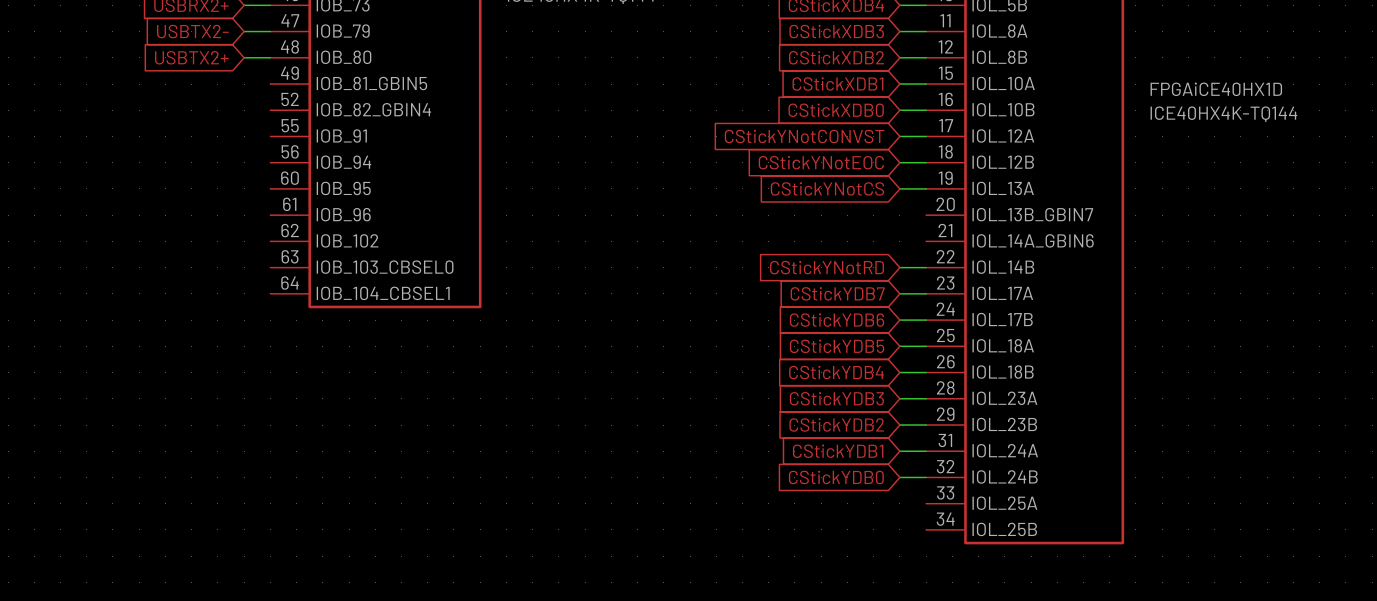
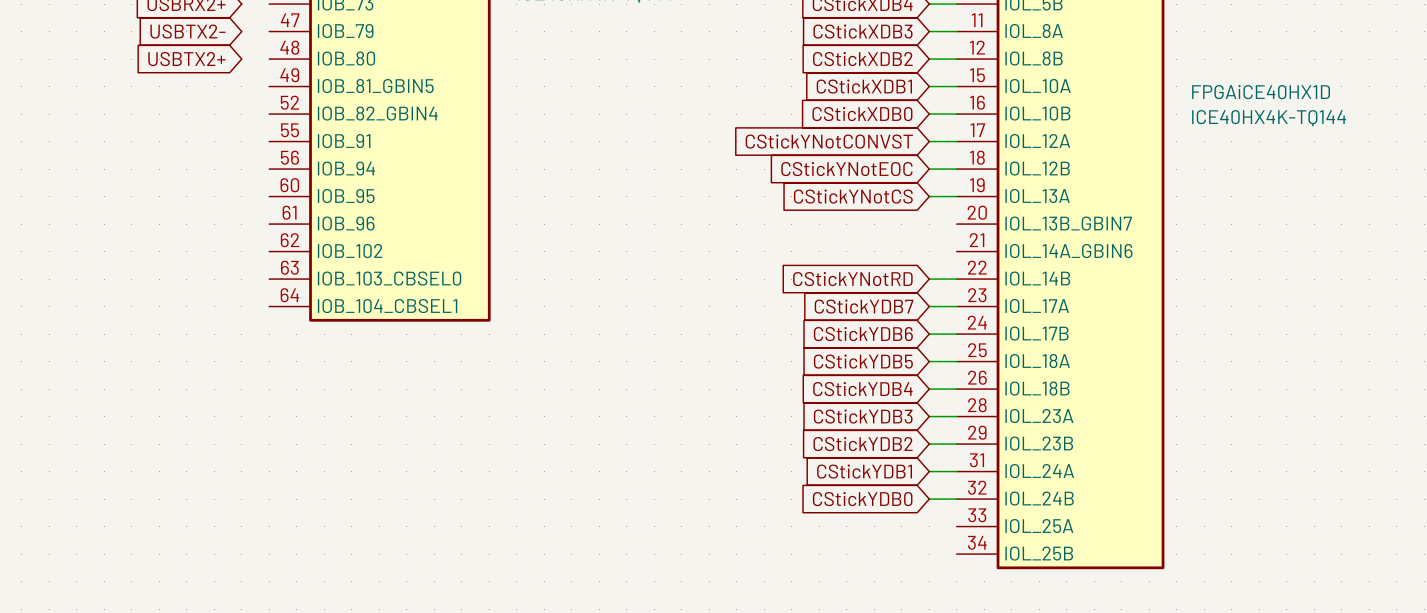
wire: (244, 5) (270, 5) -> none
wire: (244, 31) (270, 31) -> none
wire: (244, 57) (270, 57) -> none

